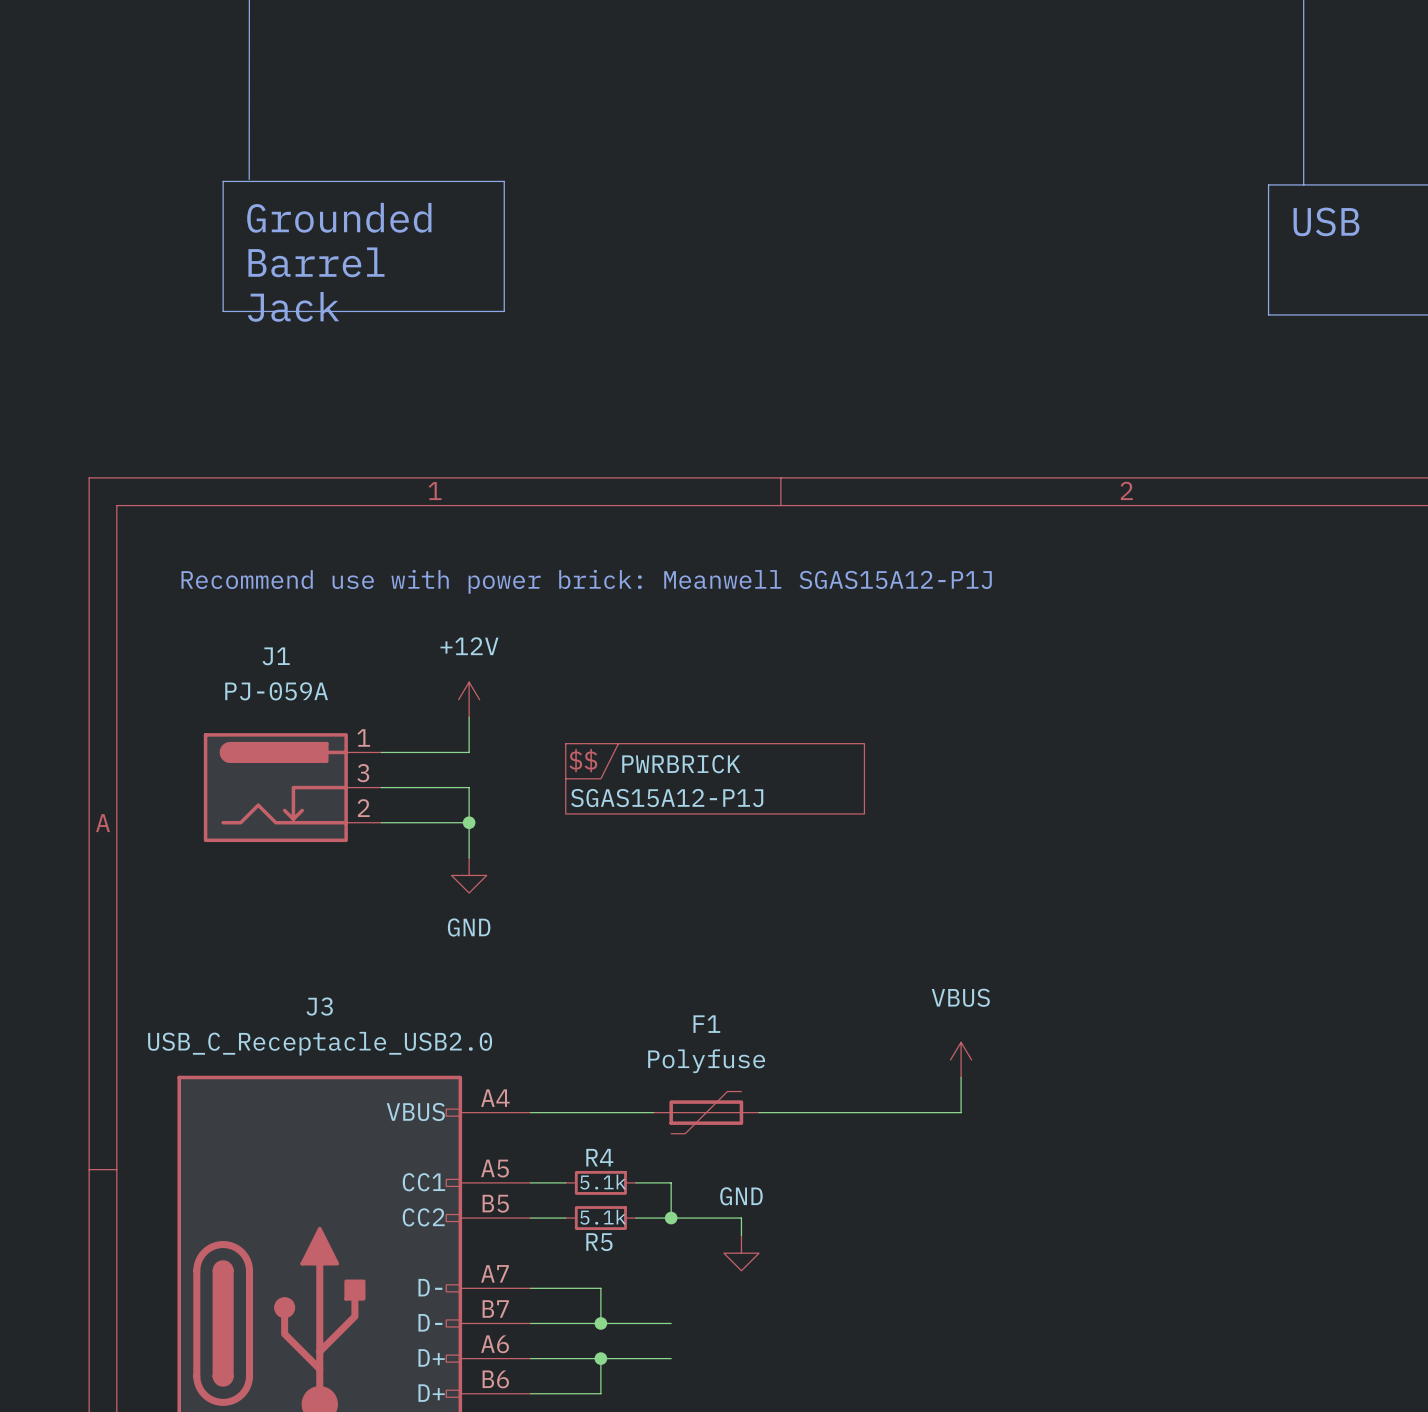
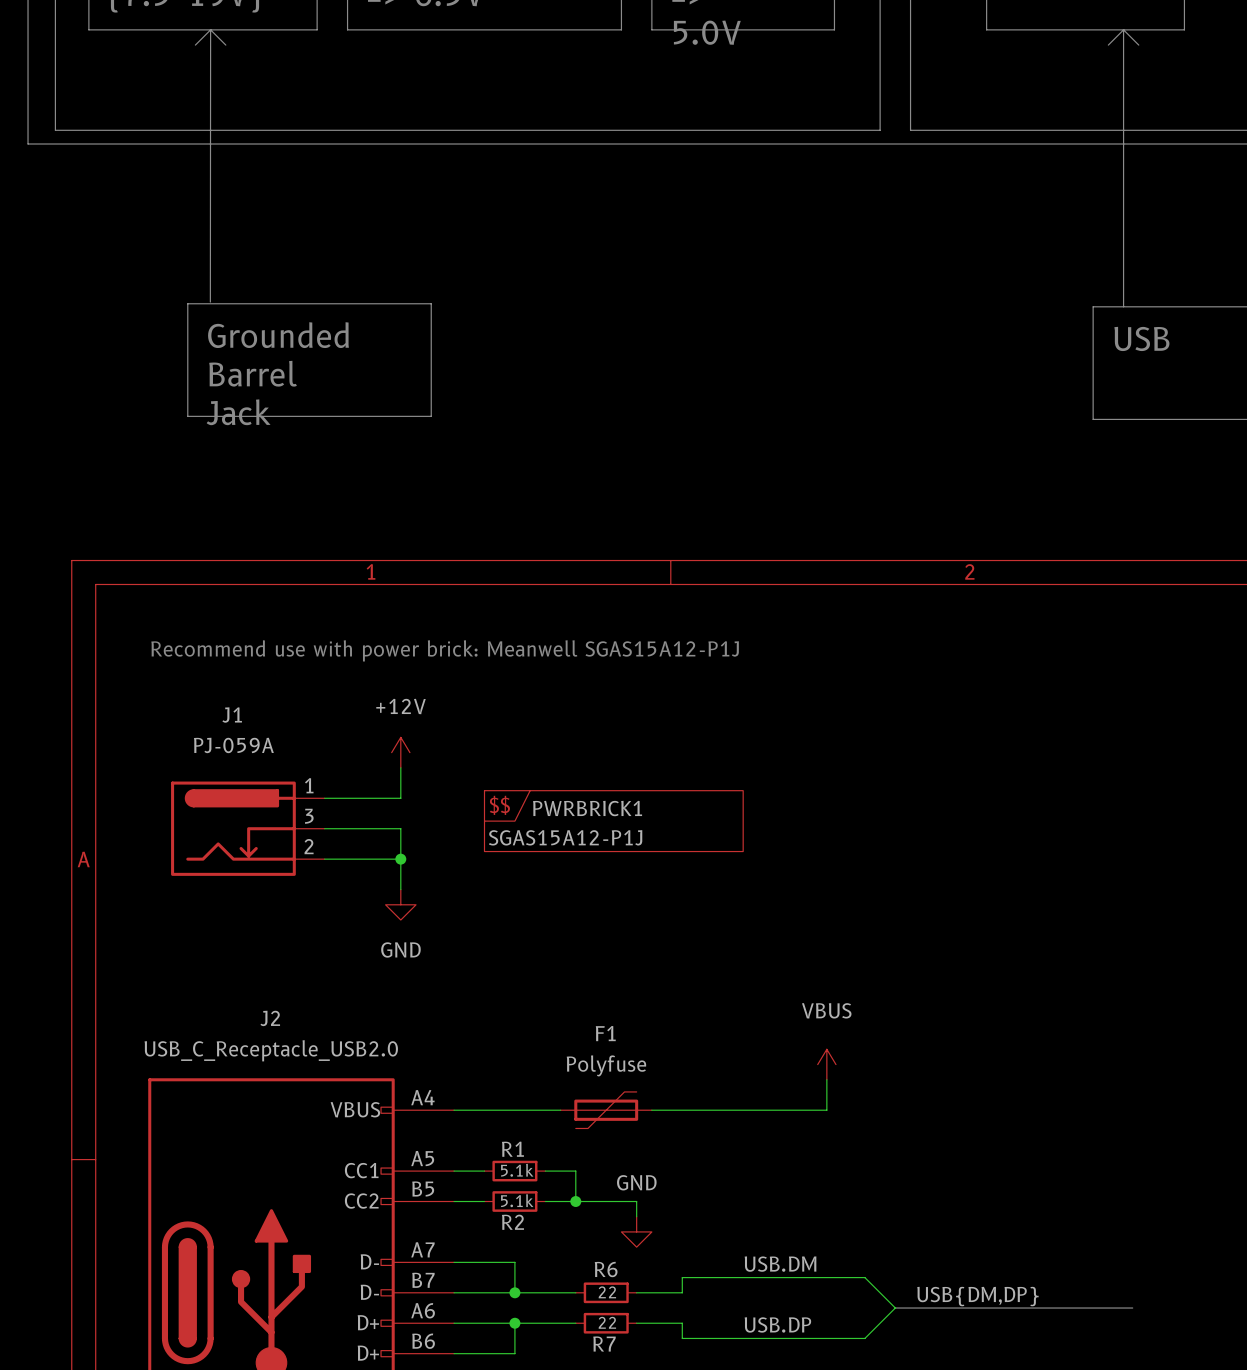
PWRBRICK name: PWRBRICK (681, 764) -> PWRBRICK1 (587, 808)
J3 name: J3 (319, 1006) -> J2 (270, 1018)
R4 name: R4 (599, 1157) -> R1 (512, 1149)
R5 name: R5 (599, 1242) -> R2 (512, 1222)
label: none -> USB.DM (780, 1264)
R6: none -> 22 (606, 1292)
wire: none -> (636, 1292) (682, 1292) (682, 1277) (864, 1277) (895, 1308) (864, 1338) (682, 1338) (682, 1323) (636, 1323)
label: none -> USB{DM,DP} (977, 1296)
bus: none -> (895, 1308) (1132, 1308)
R7: none -> 22 (606, 1323)
label: none -> USB.DP (777, 1324)

